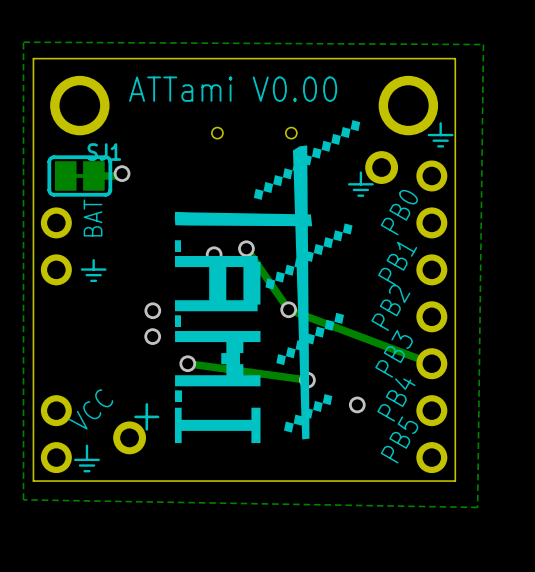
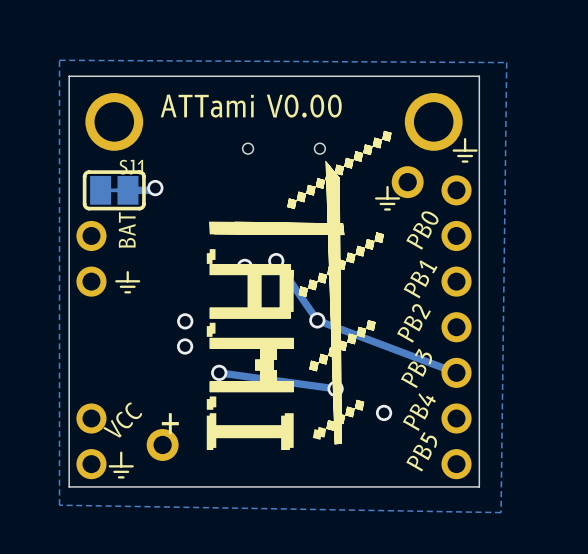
drawing: none -> [208, 130, 392, 448]
drawing: [174, 120, 361, 440] -> none

